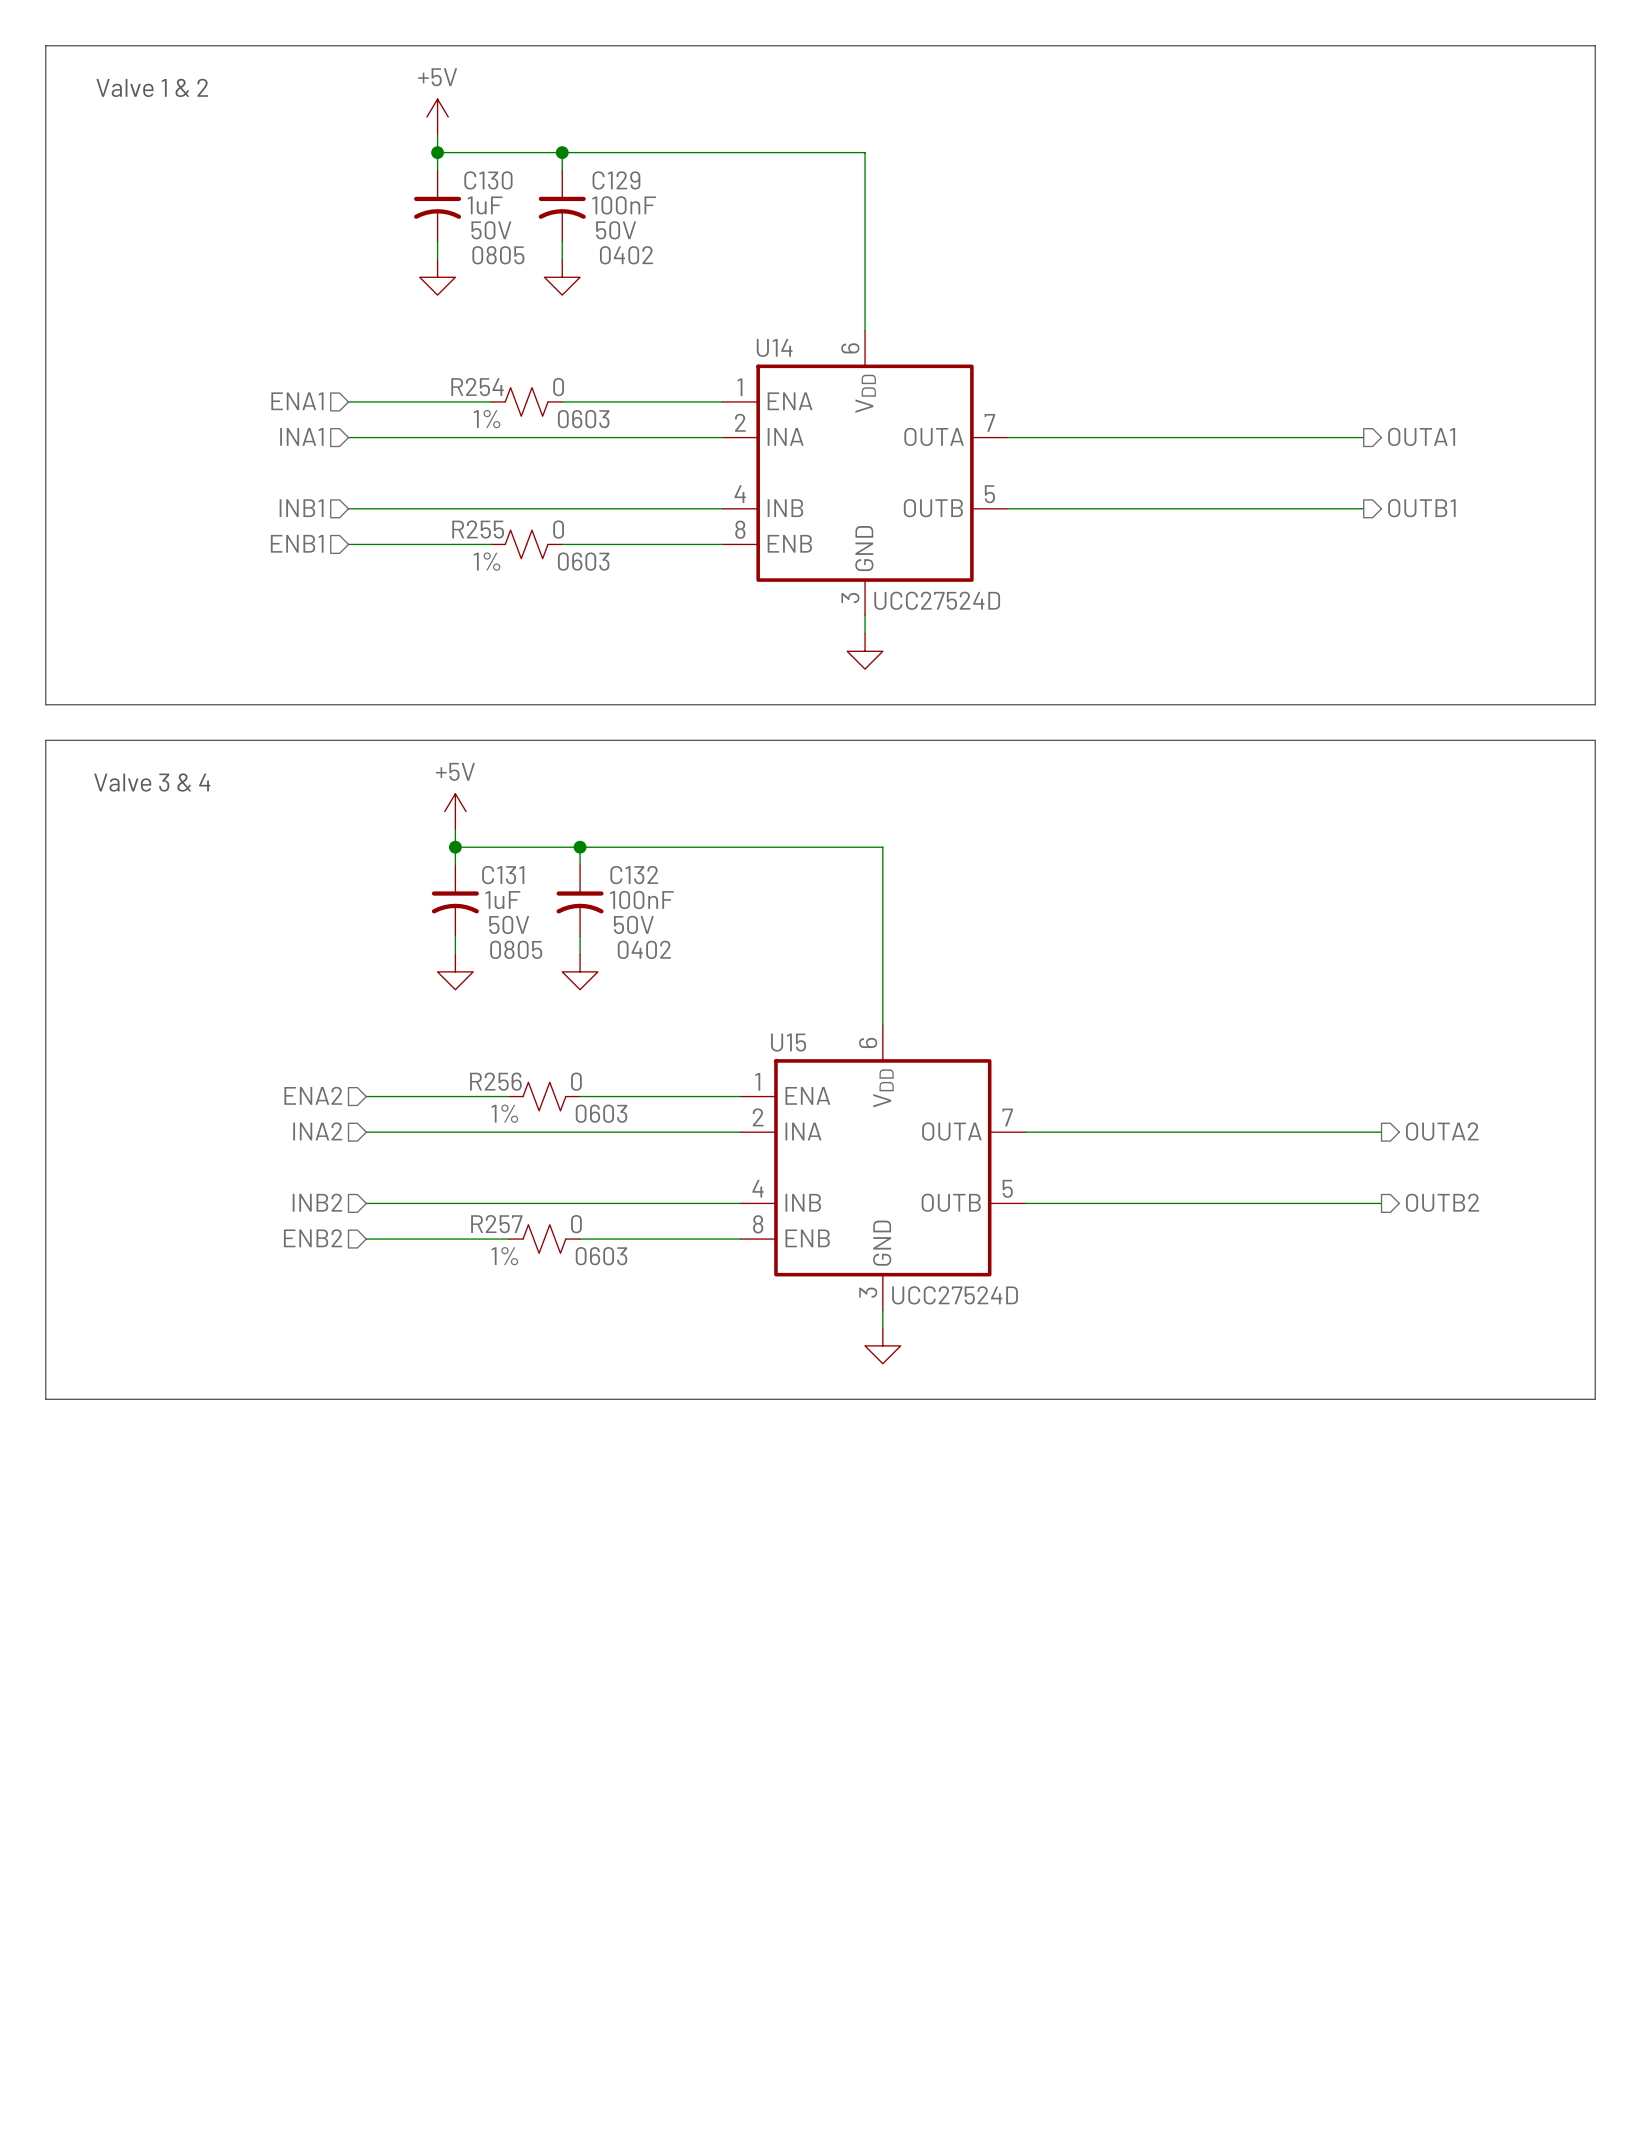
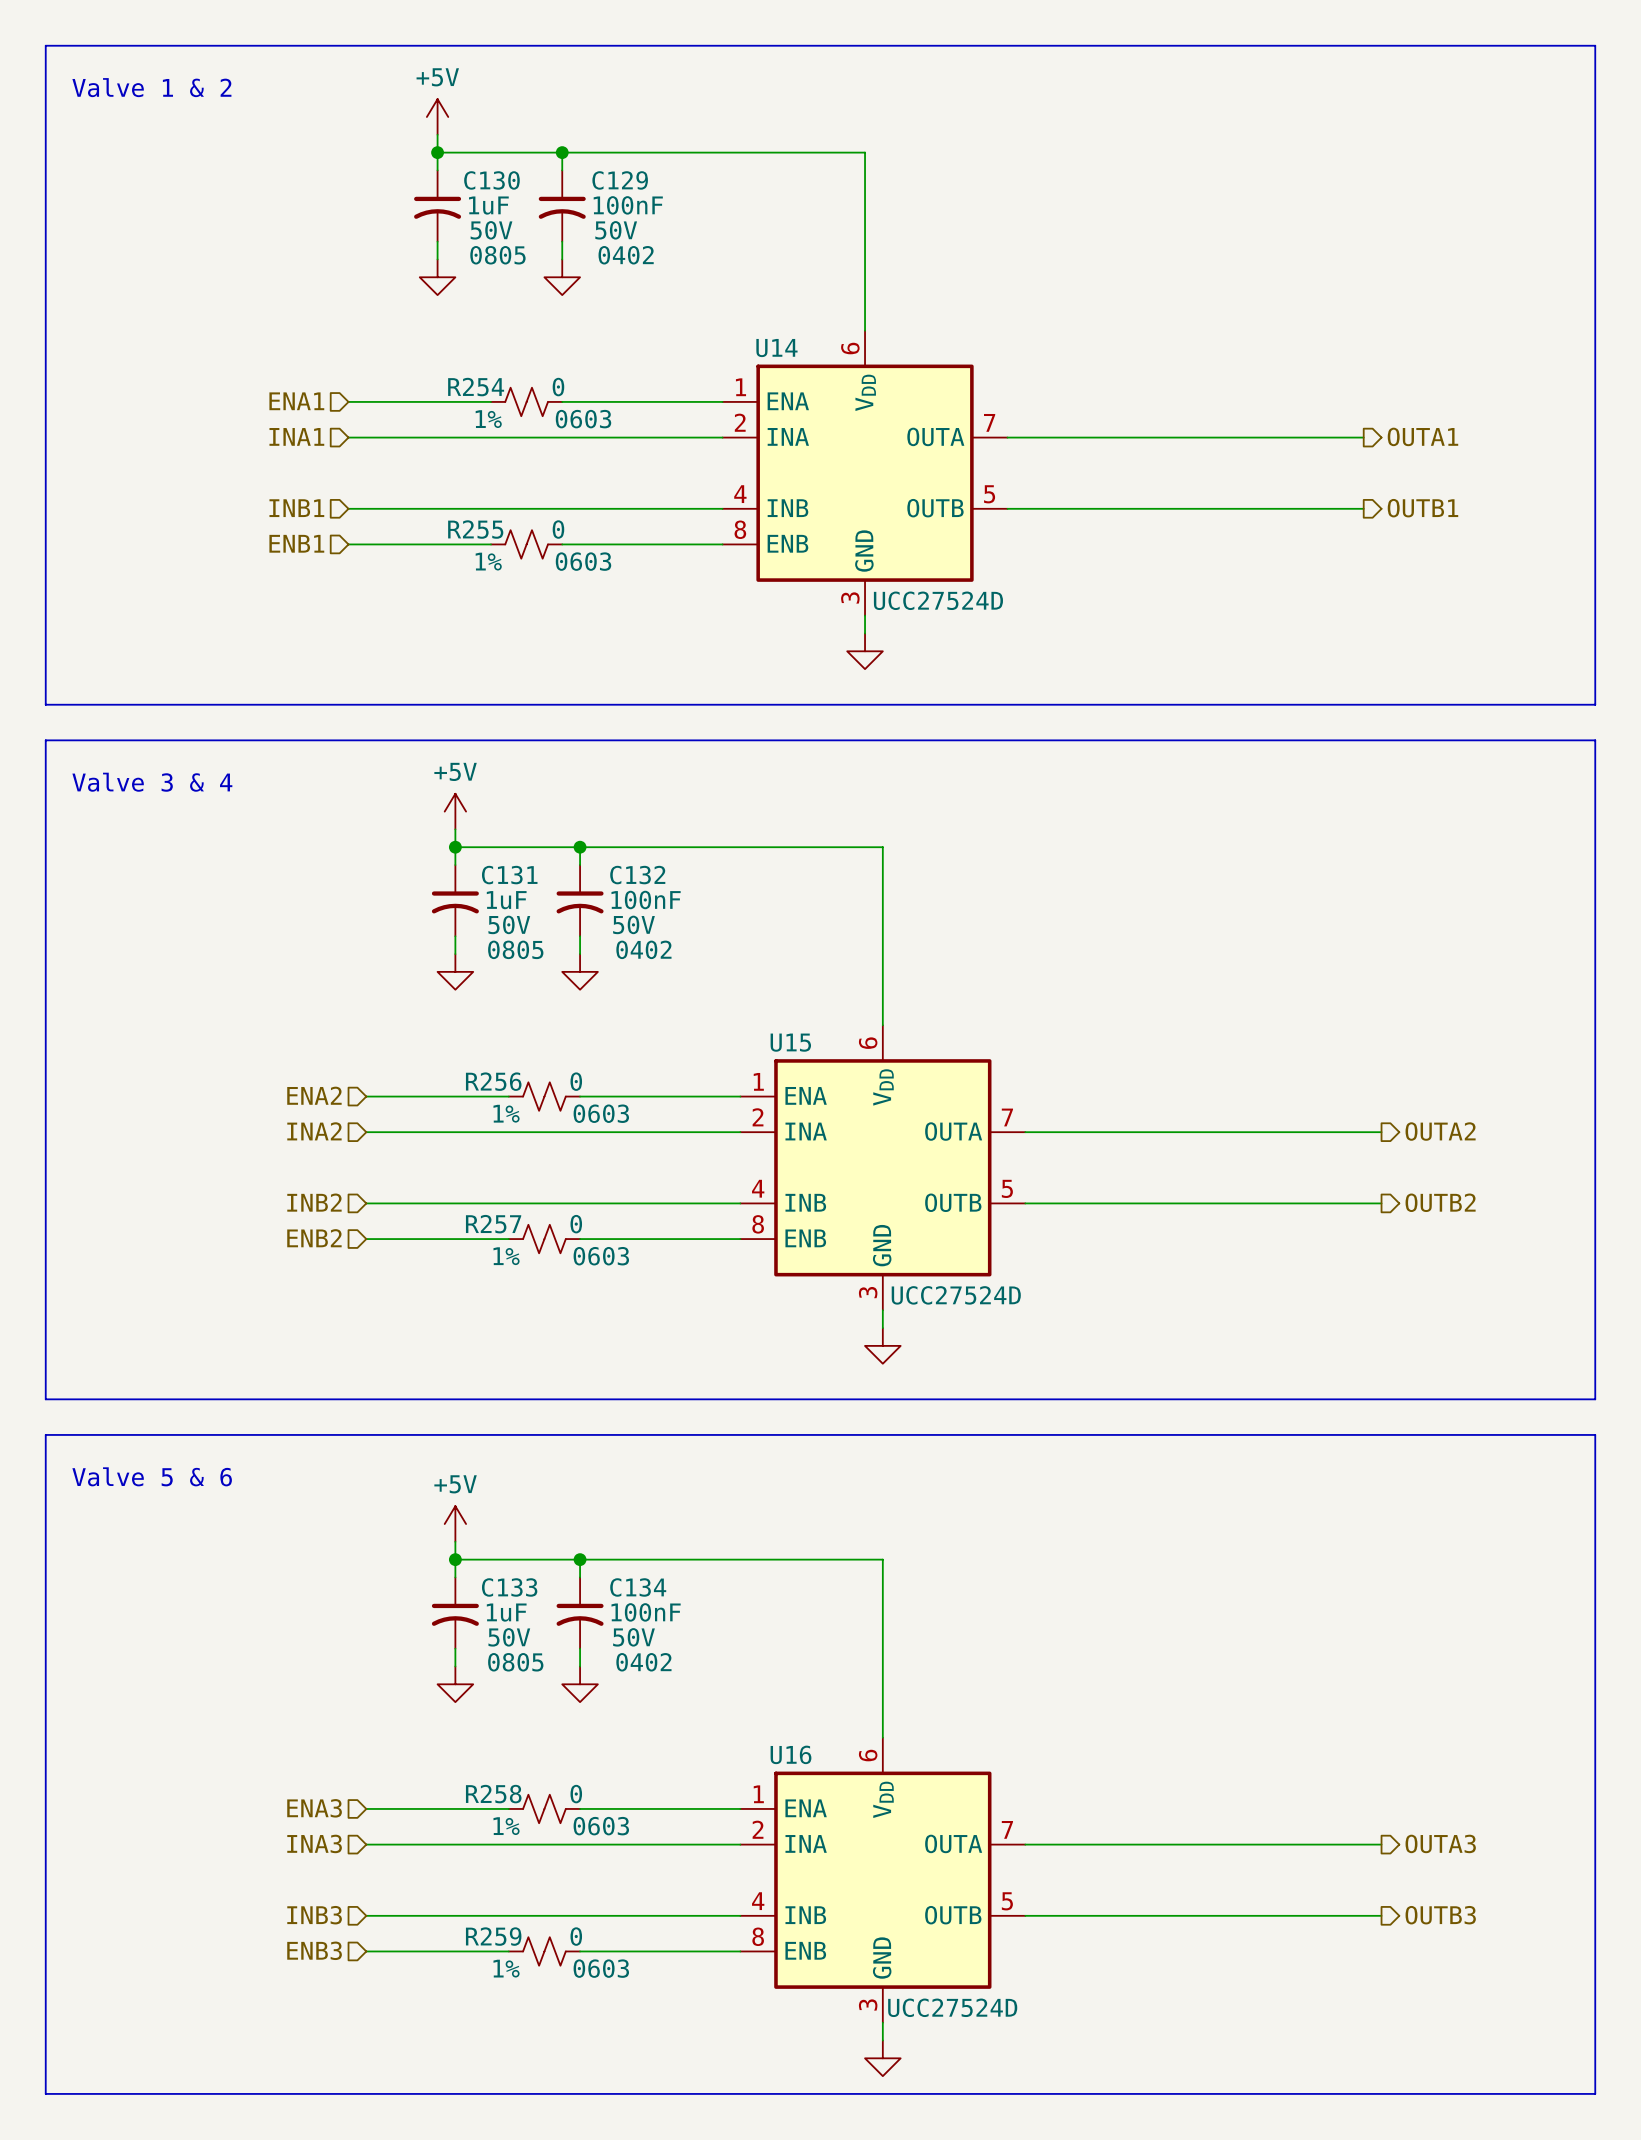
line: none -> (45, 1434) (1595, 1434) (1595, 2093) (45, 2093) (45, 1434)
text: none -> Valve 5 & 6 (152, 1476)
power symbol: none -> +5V (455, 1524)
wire: none -> (455, 1541) (455, 1577)
wire: none -> (455, 1559) (882, 1559) (882, 1737)
junction: none -> (455, 1559)
wire: none -> (580, 1559) (580, 1577)
junction: none -> (580, 1559)
C133: none -> 1uF (455, 1613)
C134: none -> 100nF (580, 1613)
wire: none -> (455, 1648) (455, 1666)
wire: none -> (580, 1648) (580, 1666)
power symbol: none -> (455, 1684)
power symbol: none -> (580, 1684)
hierarchical label: none -> ENA3 (314, 1808)
wire: none -> (366, 1808) (508, 1808)
R258: none -> 0 (544, 1808)
wire: none -> (580, 1808) (740, 1808)
hierarchical label: none -> OUTA3 (1440, 1843)
hierarchical label: none -> INA3 (314, 1843)
wire: none -> (366, 1844) (740, 1844)
wire: none -> (1025, 1844) (1381, 1844)
U16: none -> UCC27524D (882, 1880)
hierarchical label: none -> INB3 (314, 1915)
wire: none -> (366, 1915) (740, 1915)
wire: none -> (1025, 1915) (1381, 1915)
hierarchical label: none -> OUTB3 (1440, 1915)
hierarchical label: none -> ENB3 (314, 1950)
wire: none -> (366, 1951) (508, 1951)
R259: none -> 0 (544, 1951)
wire: none -> (580, 1951) (740, 1951)
wire: none -> (882, 2022) (882, 2040)
power symbol: none -> (882, 2058)

